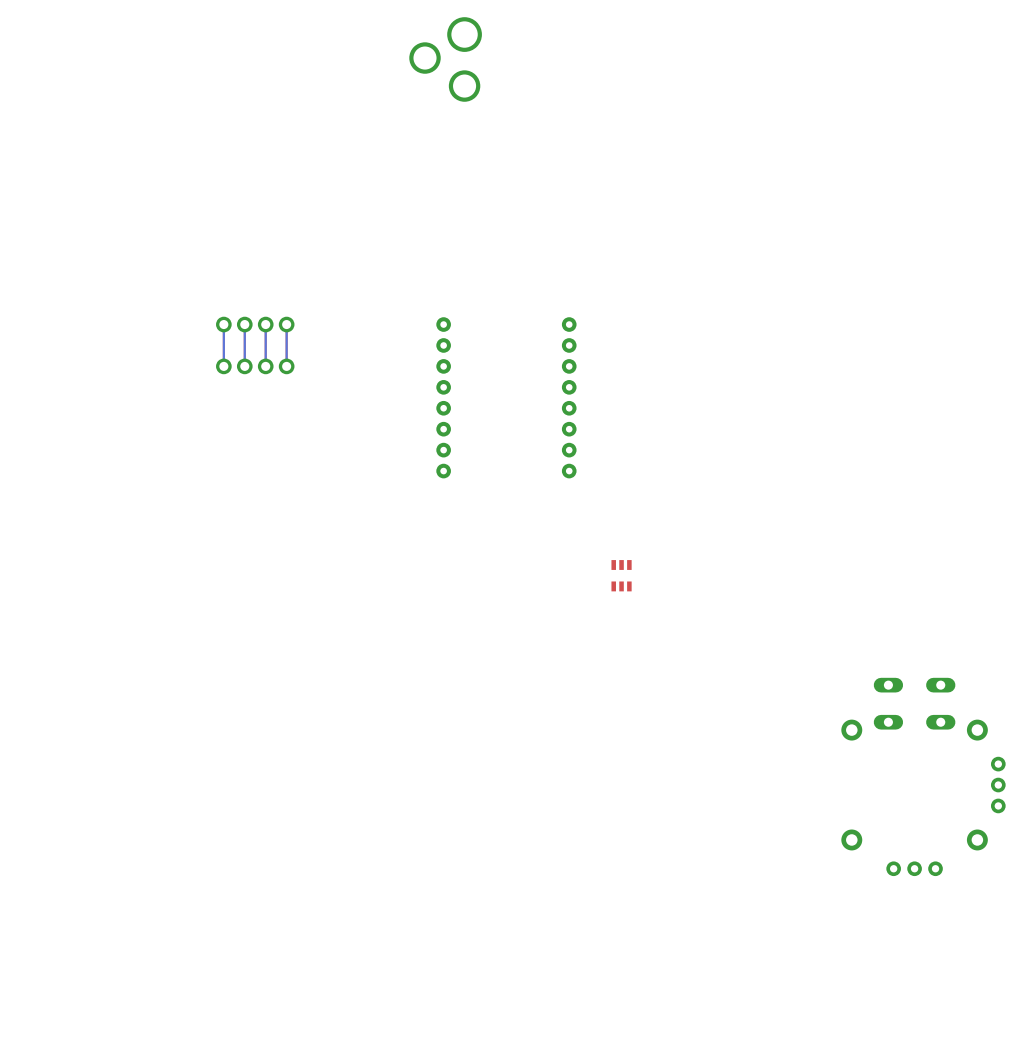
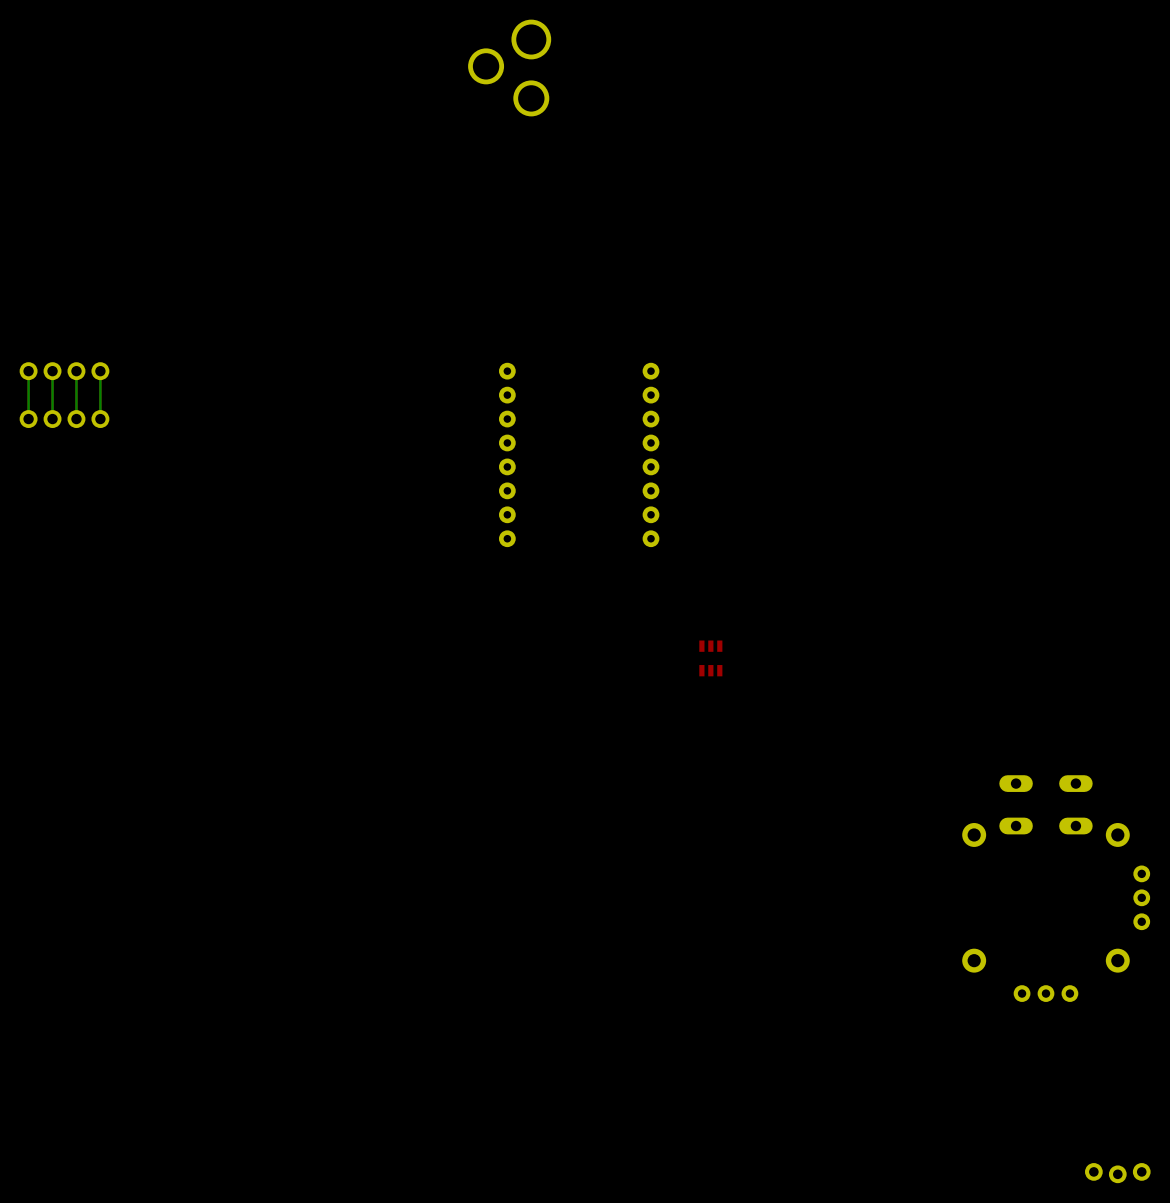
part position: (255, 345) -> (64, 395)
part: none -> (1117, 1173)

